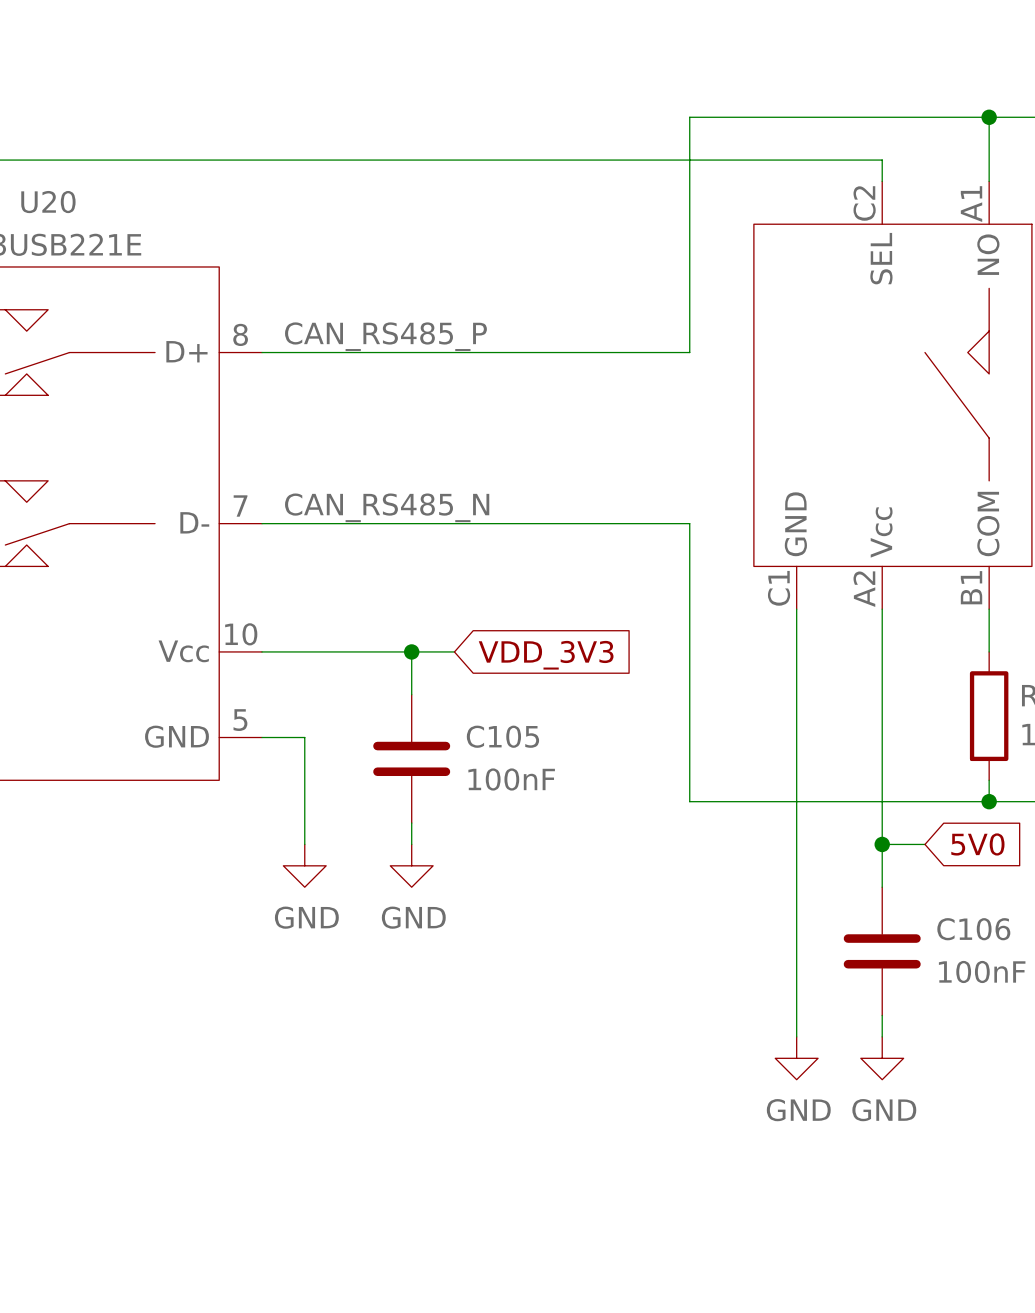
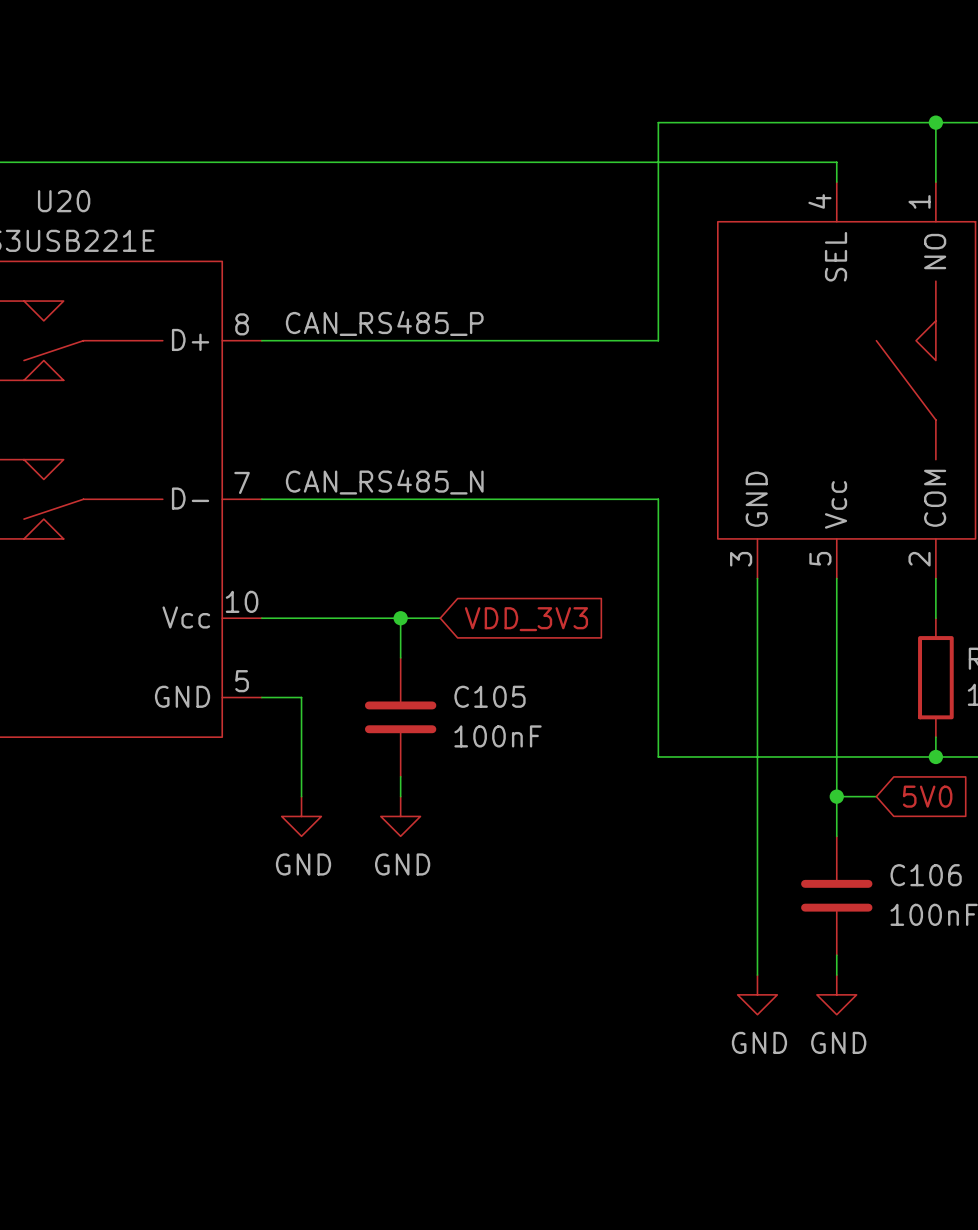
part pin number: C2 (864, 203) -> 4 (819, 201)
part pin number: A1 (971, 204) -> 1 (919, 201)
part pin number: B1 (971, 587) -> 2 (919, 559)
part pin number: C1 (779, 588) -> 3 (741, 559)
part pin number: A2 (864, 589) -> 5 (820, 558)

